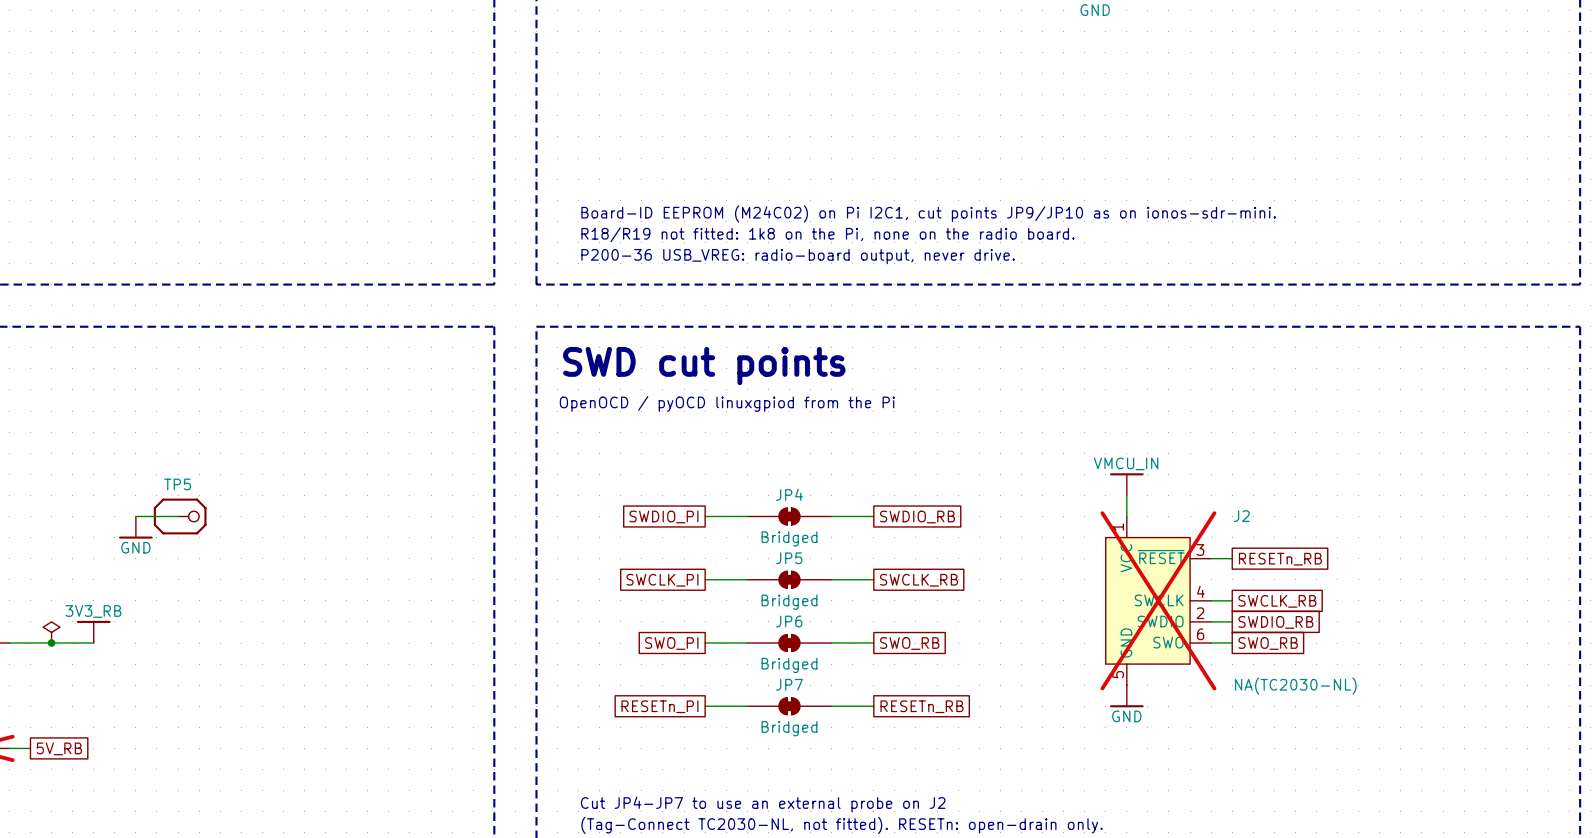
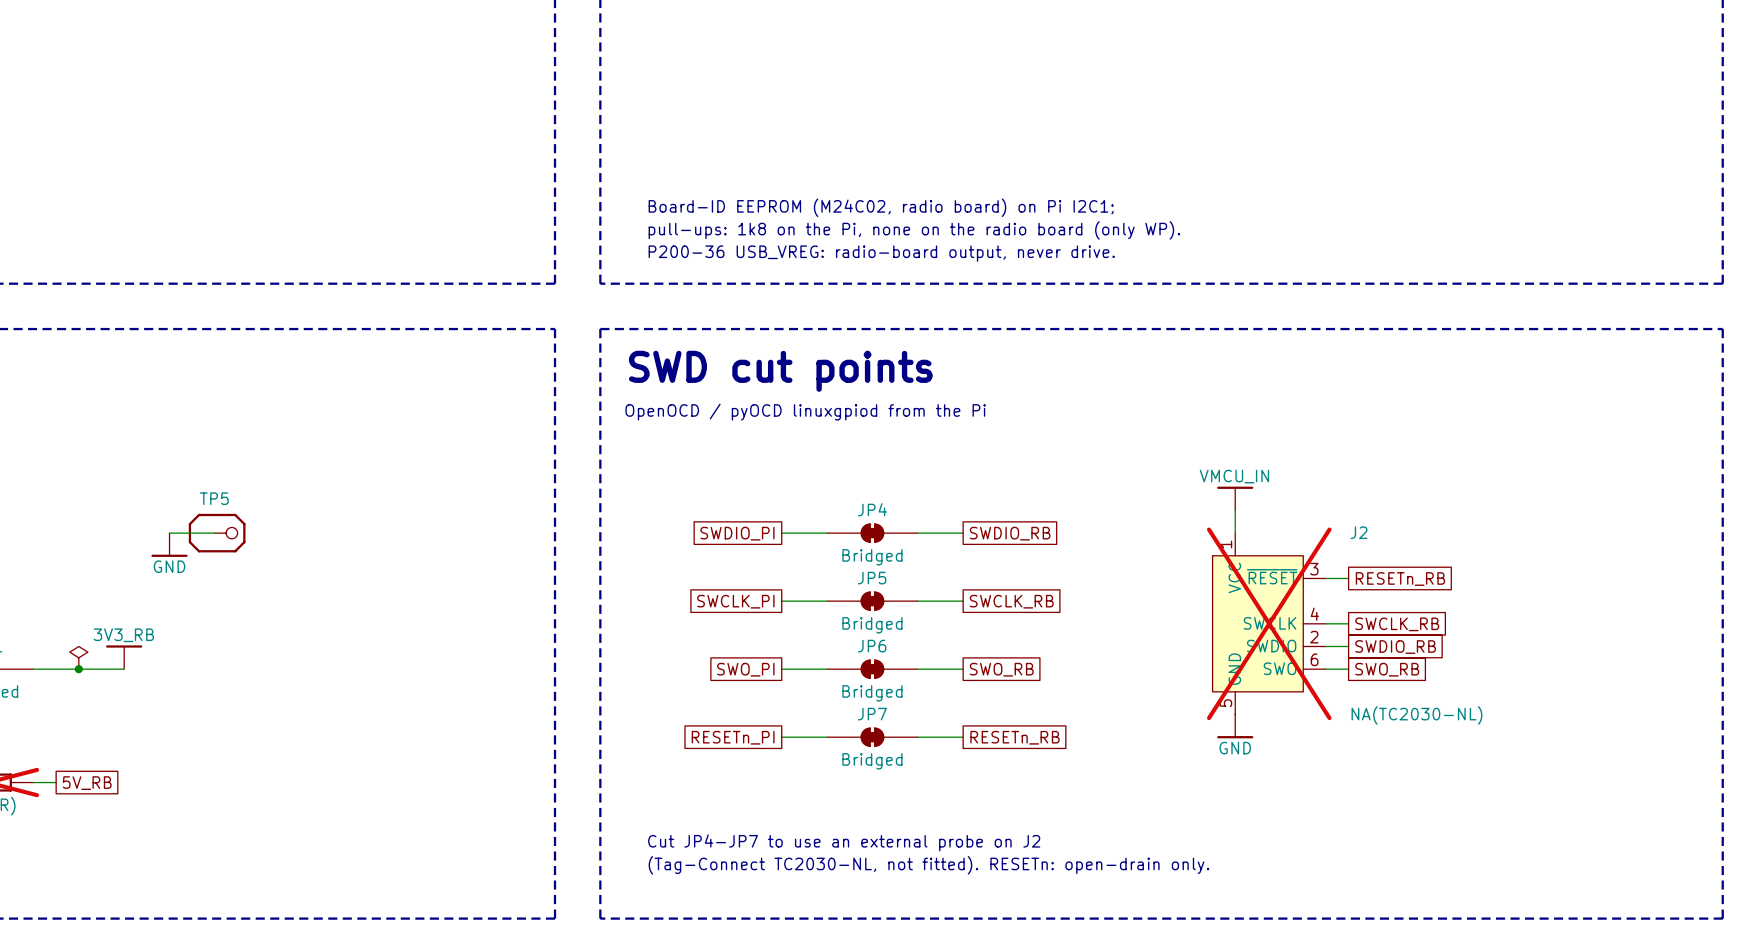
text: Board-ID EEPROM (M24C02) on Pi I2C1, cut points JP9/JP10 as on ionos-sdr-mini. (928, 213) -> Board-ID EEPROM (M24C02, radio board) on Pi I2C1; (881, 207)
text: R18/R19 not fitted: 1k8 on the Pi, none on the radio board. (827, 234) -> pull-ups: 1k8 on the Pi, none on the radio board (only WP). (914, 230)

